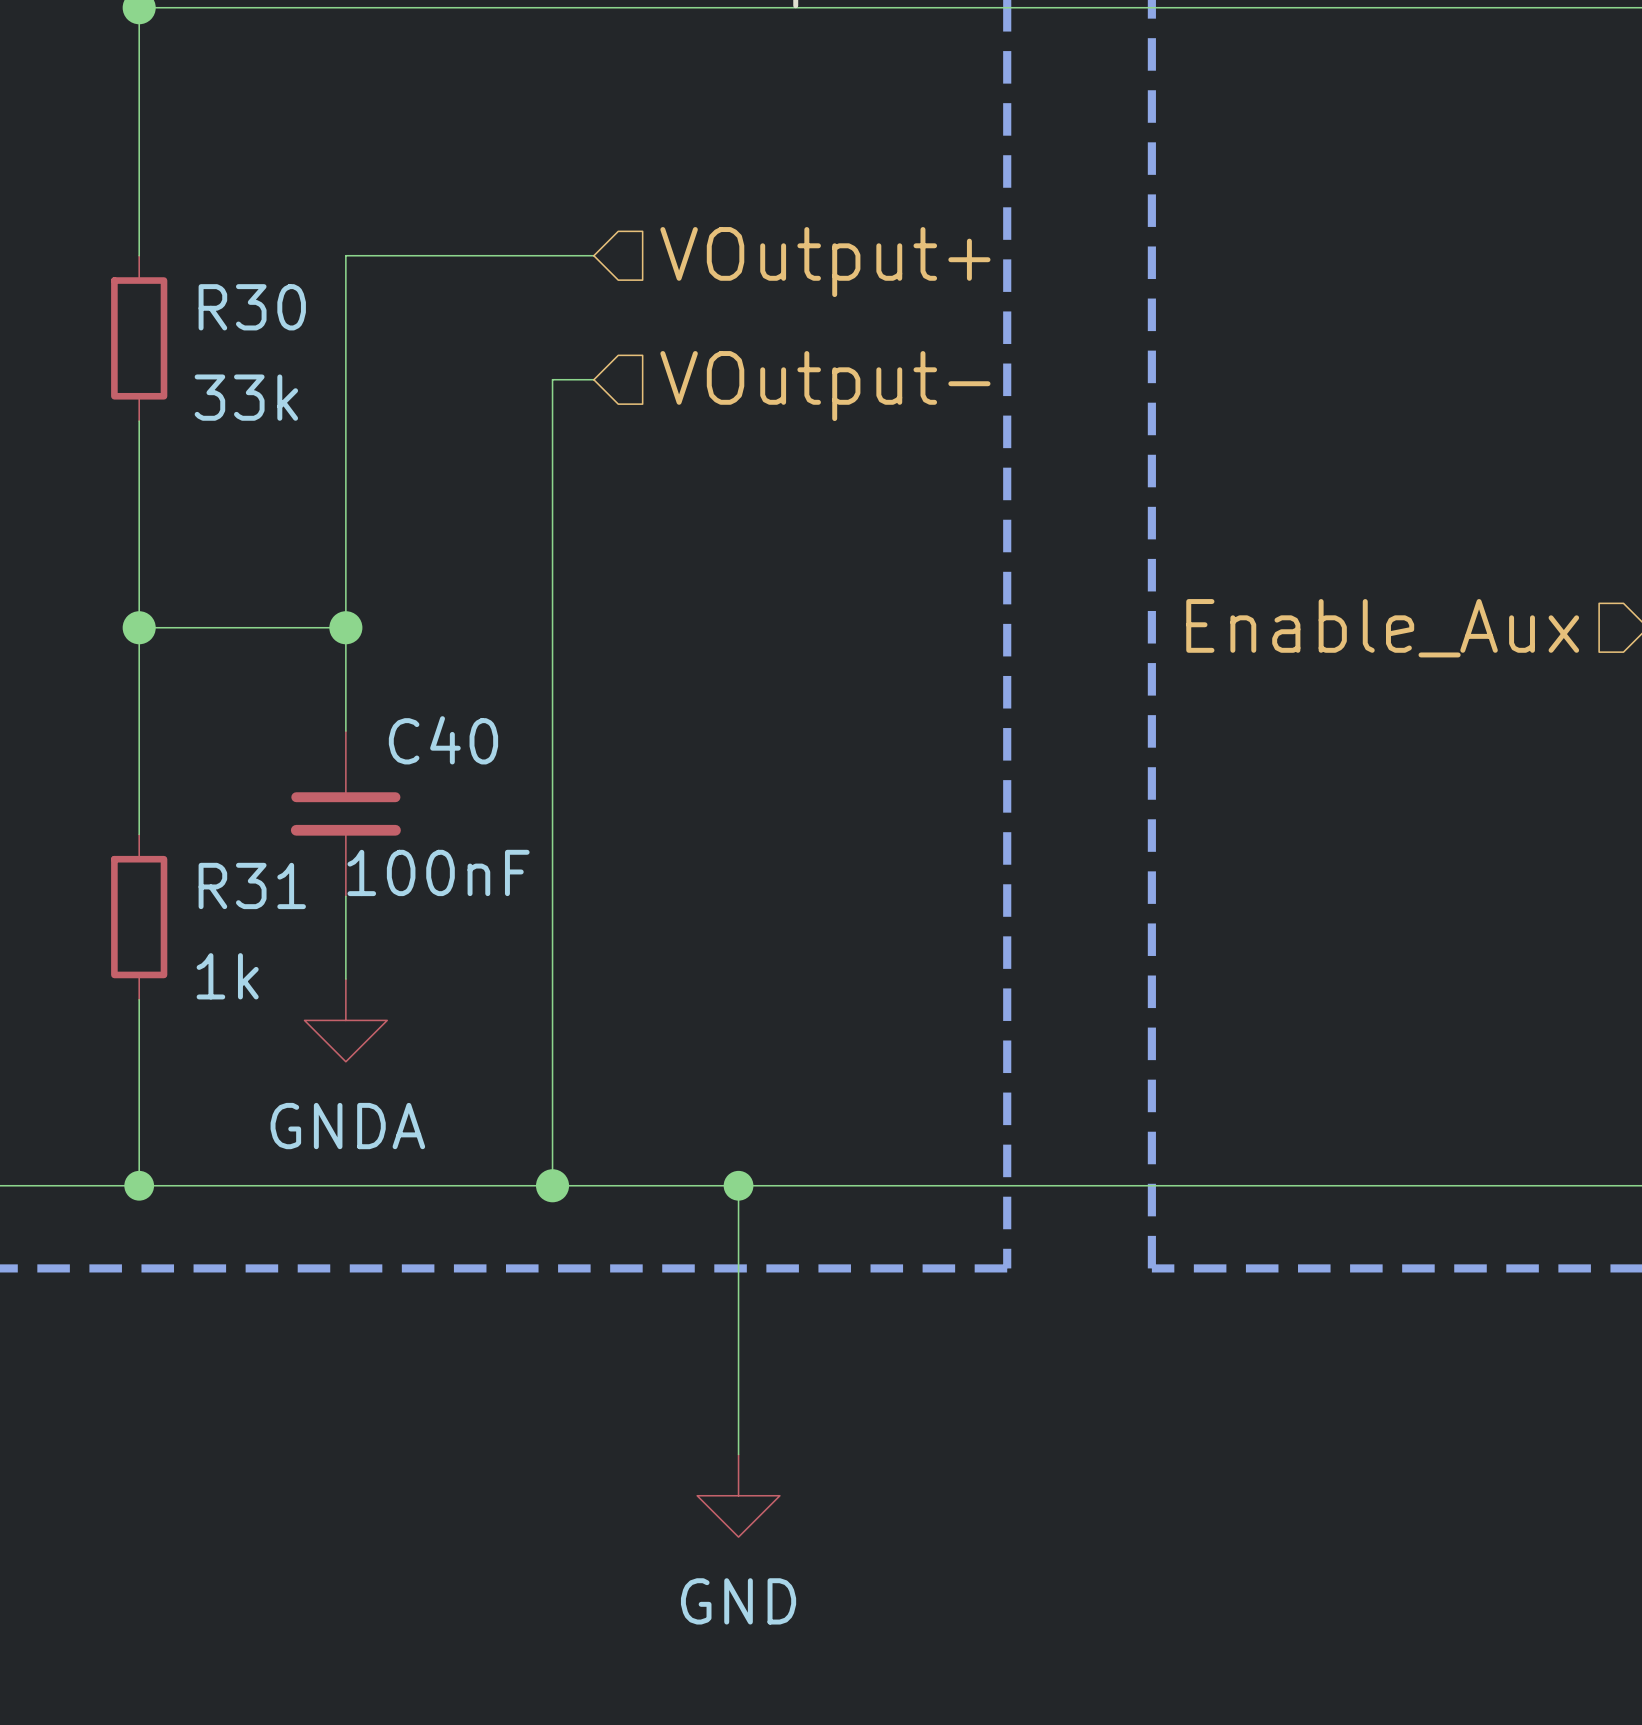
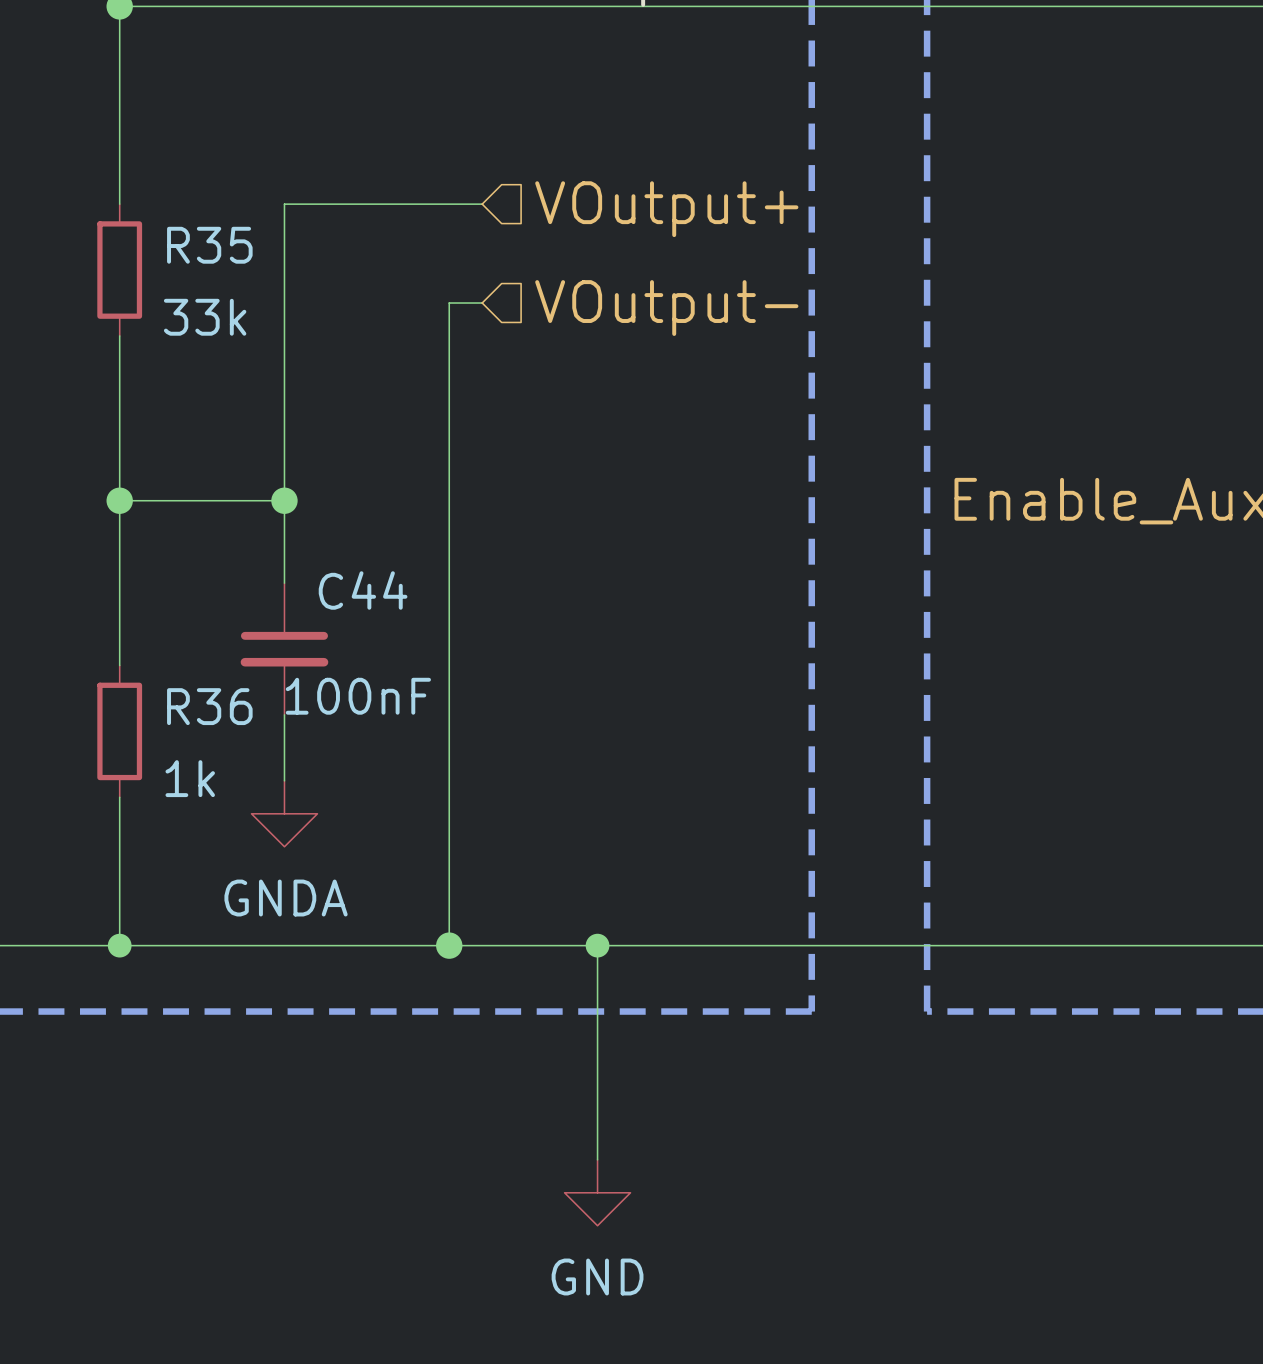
R30 name: R30 (252, 307) -> R35 (209, 245)
C40 name: C40 (443, 740) -> C44 (363, 590)
R31 name: R31 (252, 885) -> R36 (209, 706)

